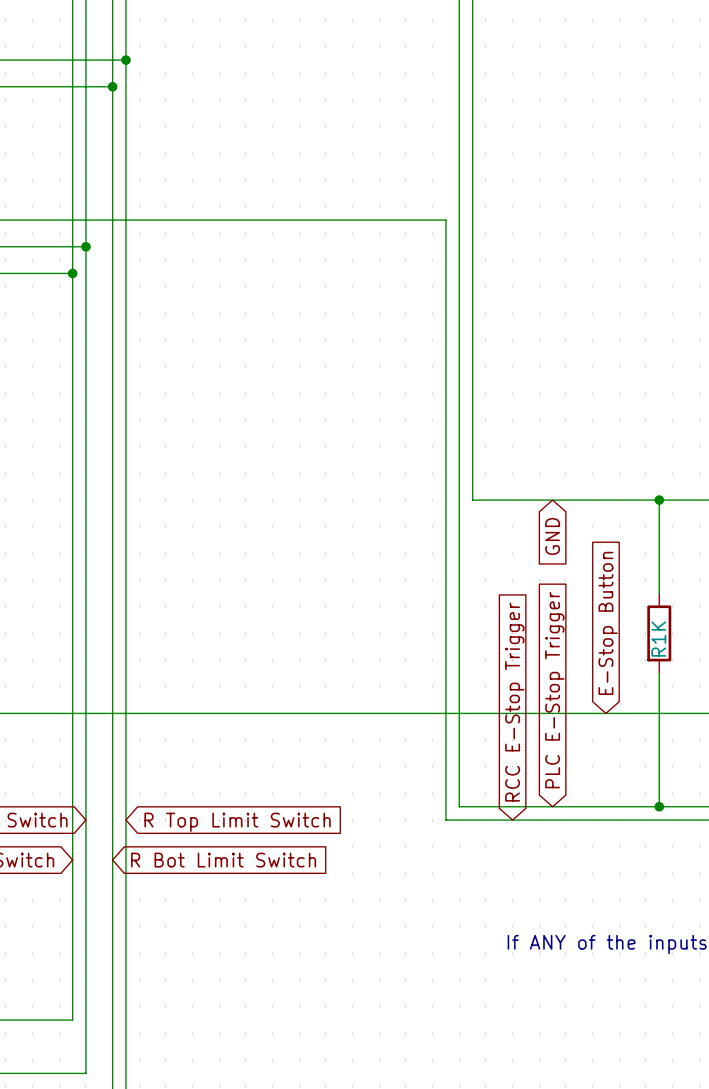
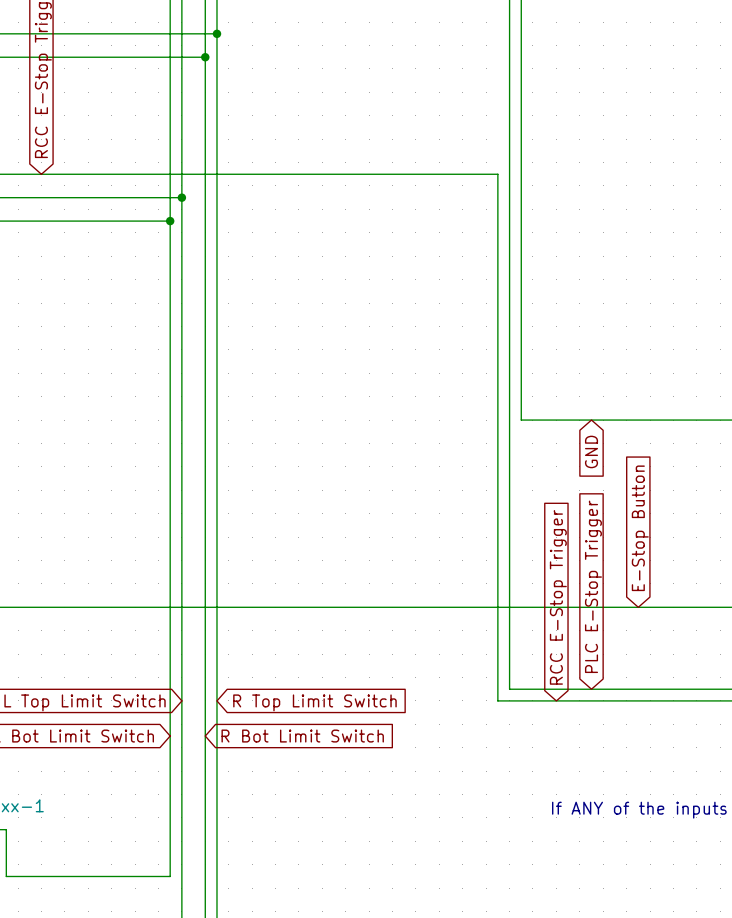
wire: (659, 500) (659, 593) -> none
junction: (659, 500) -> none
part: R1K (659, 633) -> none
wire: (659, 673) (659, 806) -> none
junction: (659, 806) -> none

